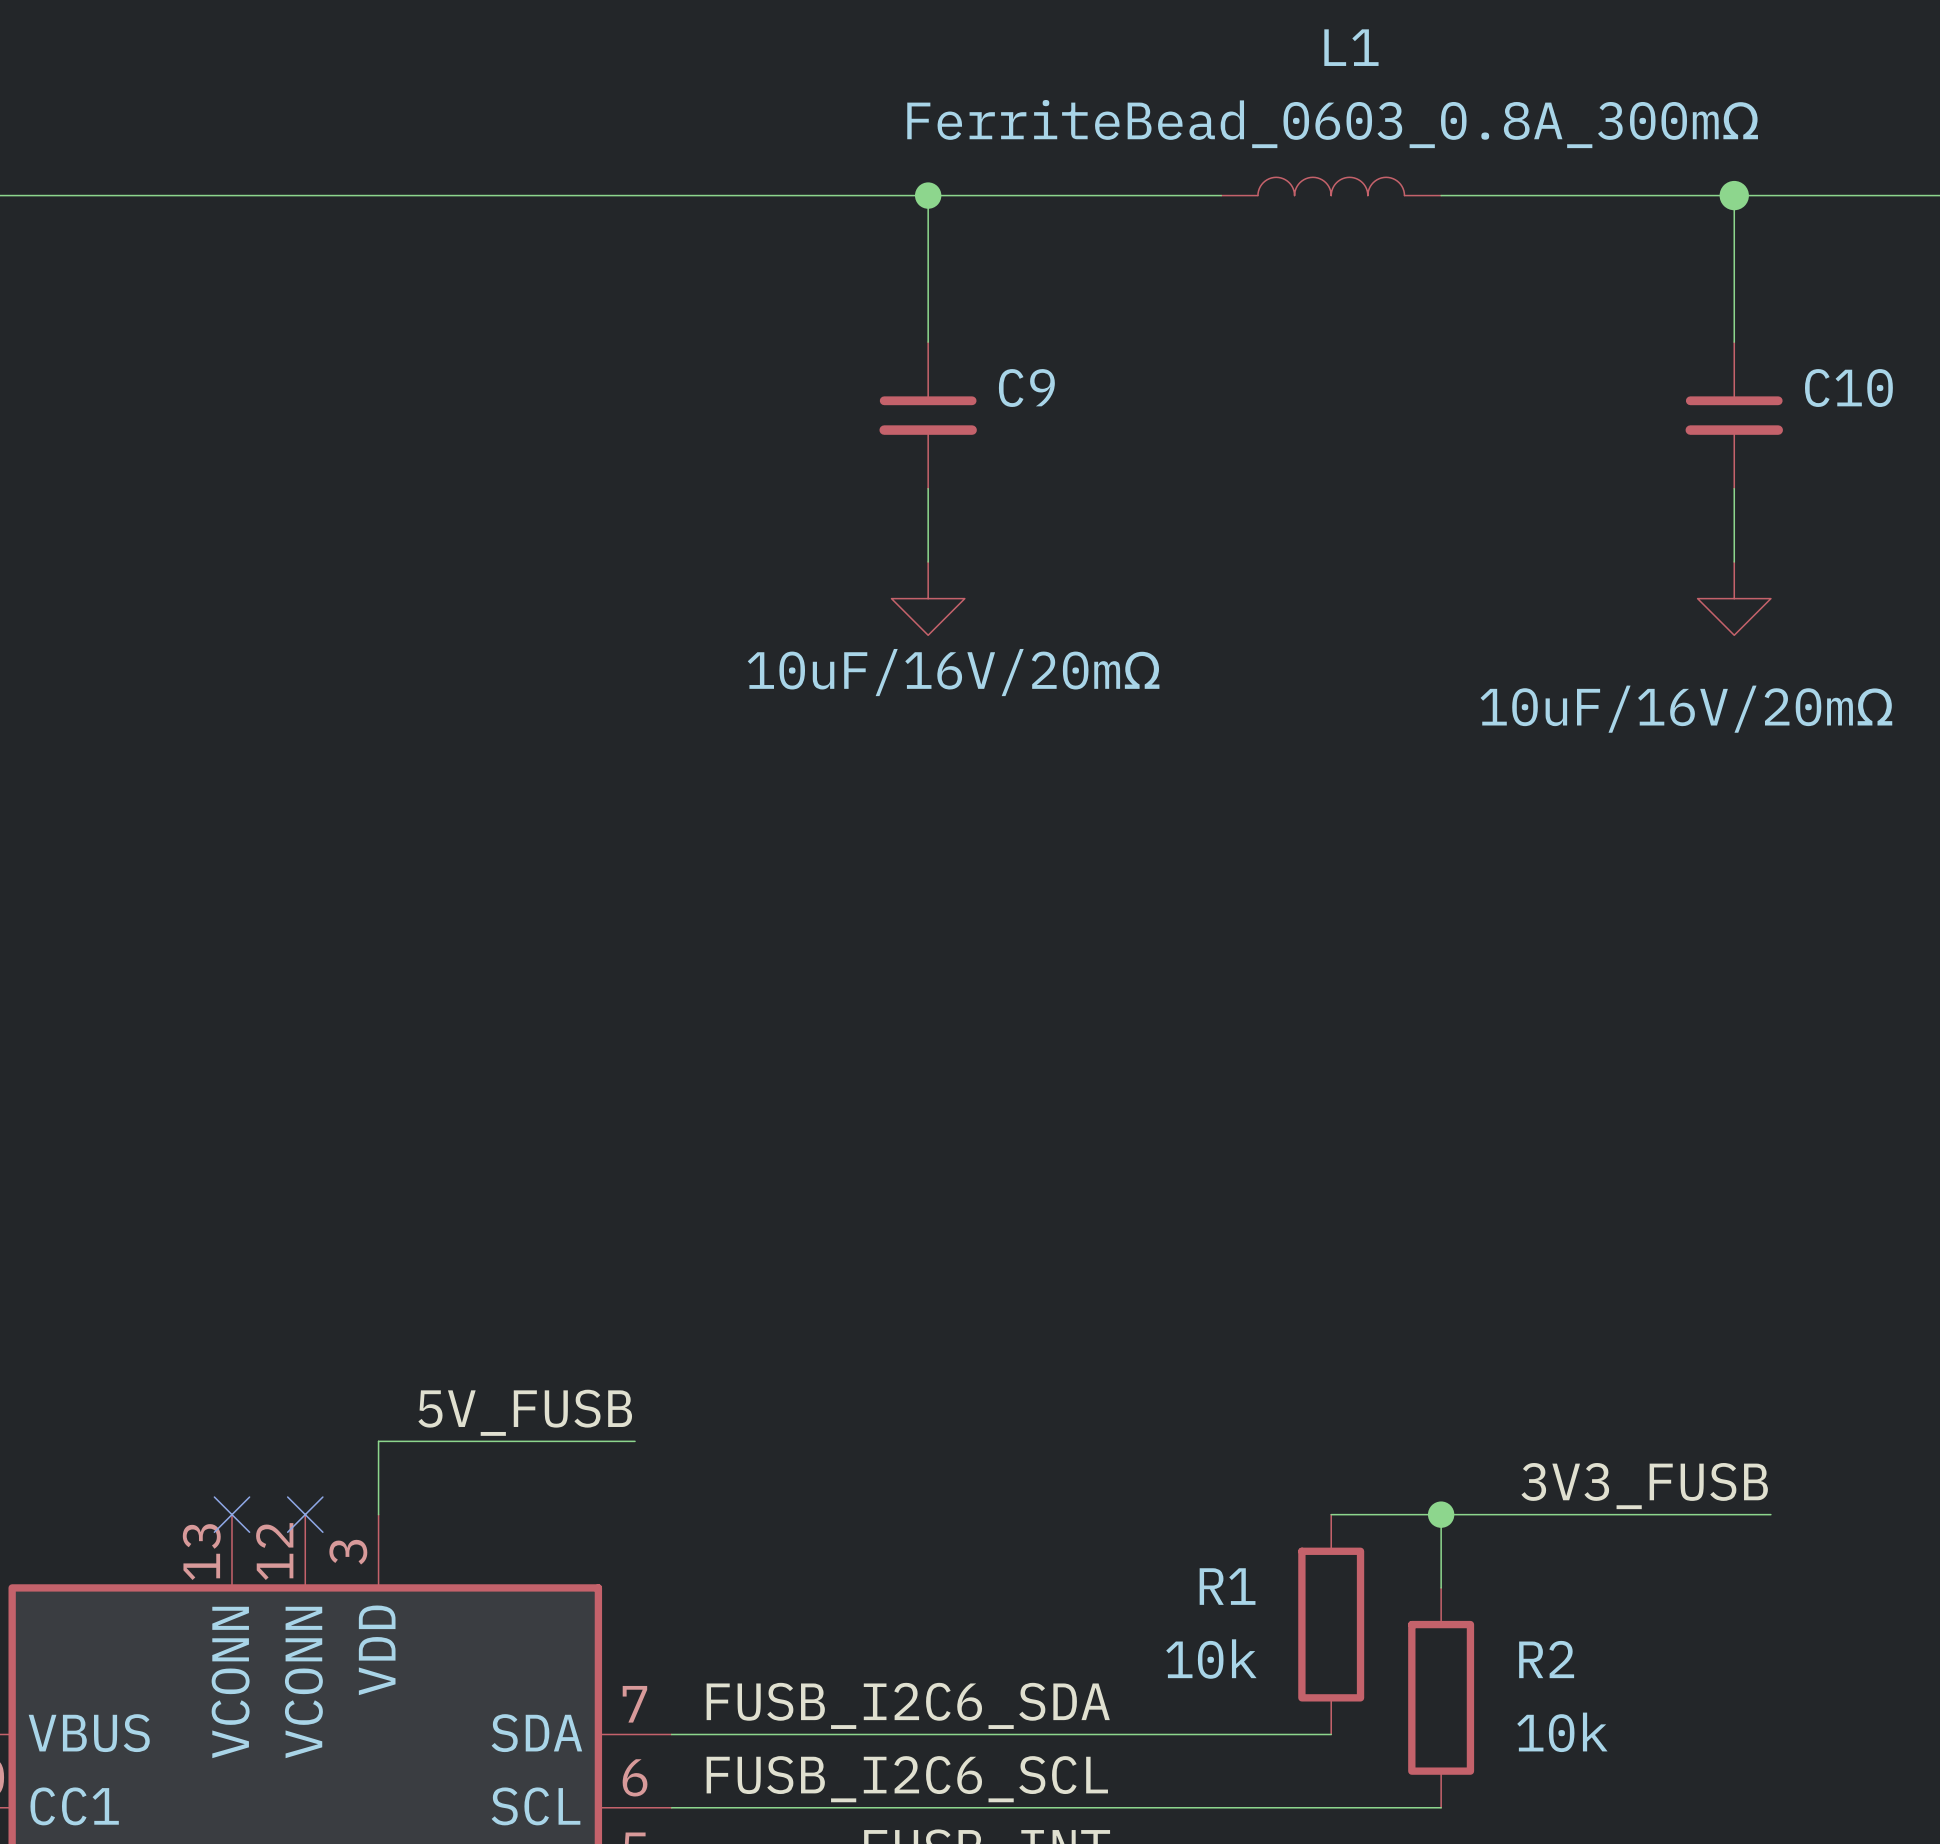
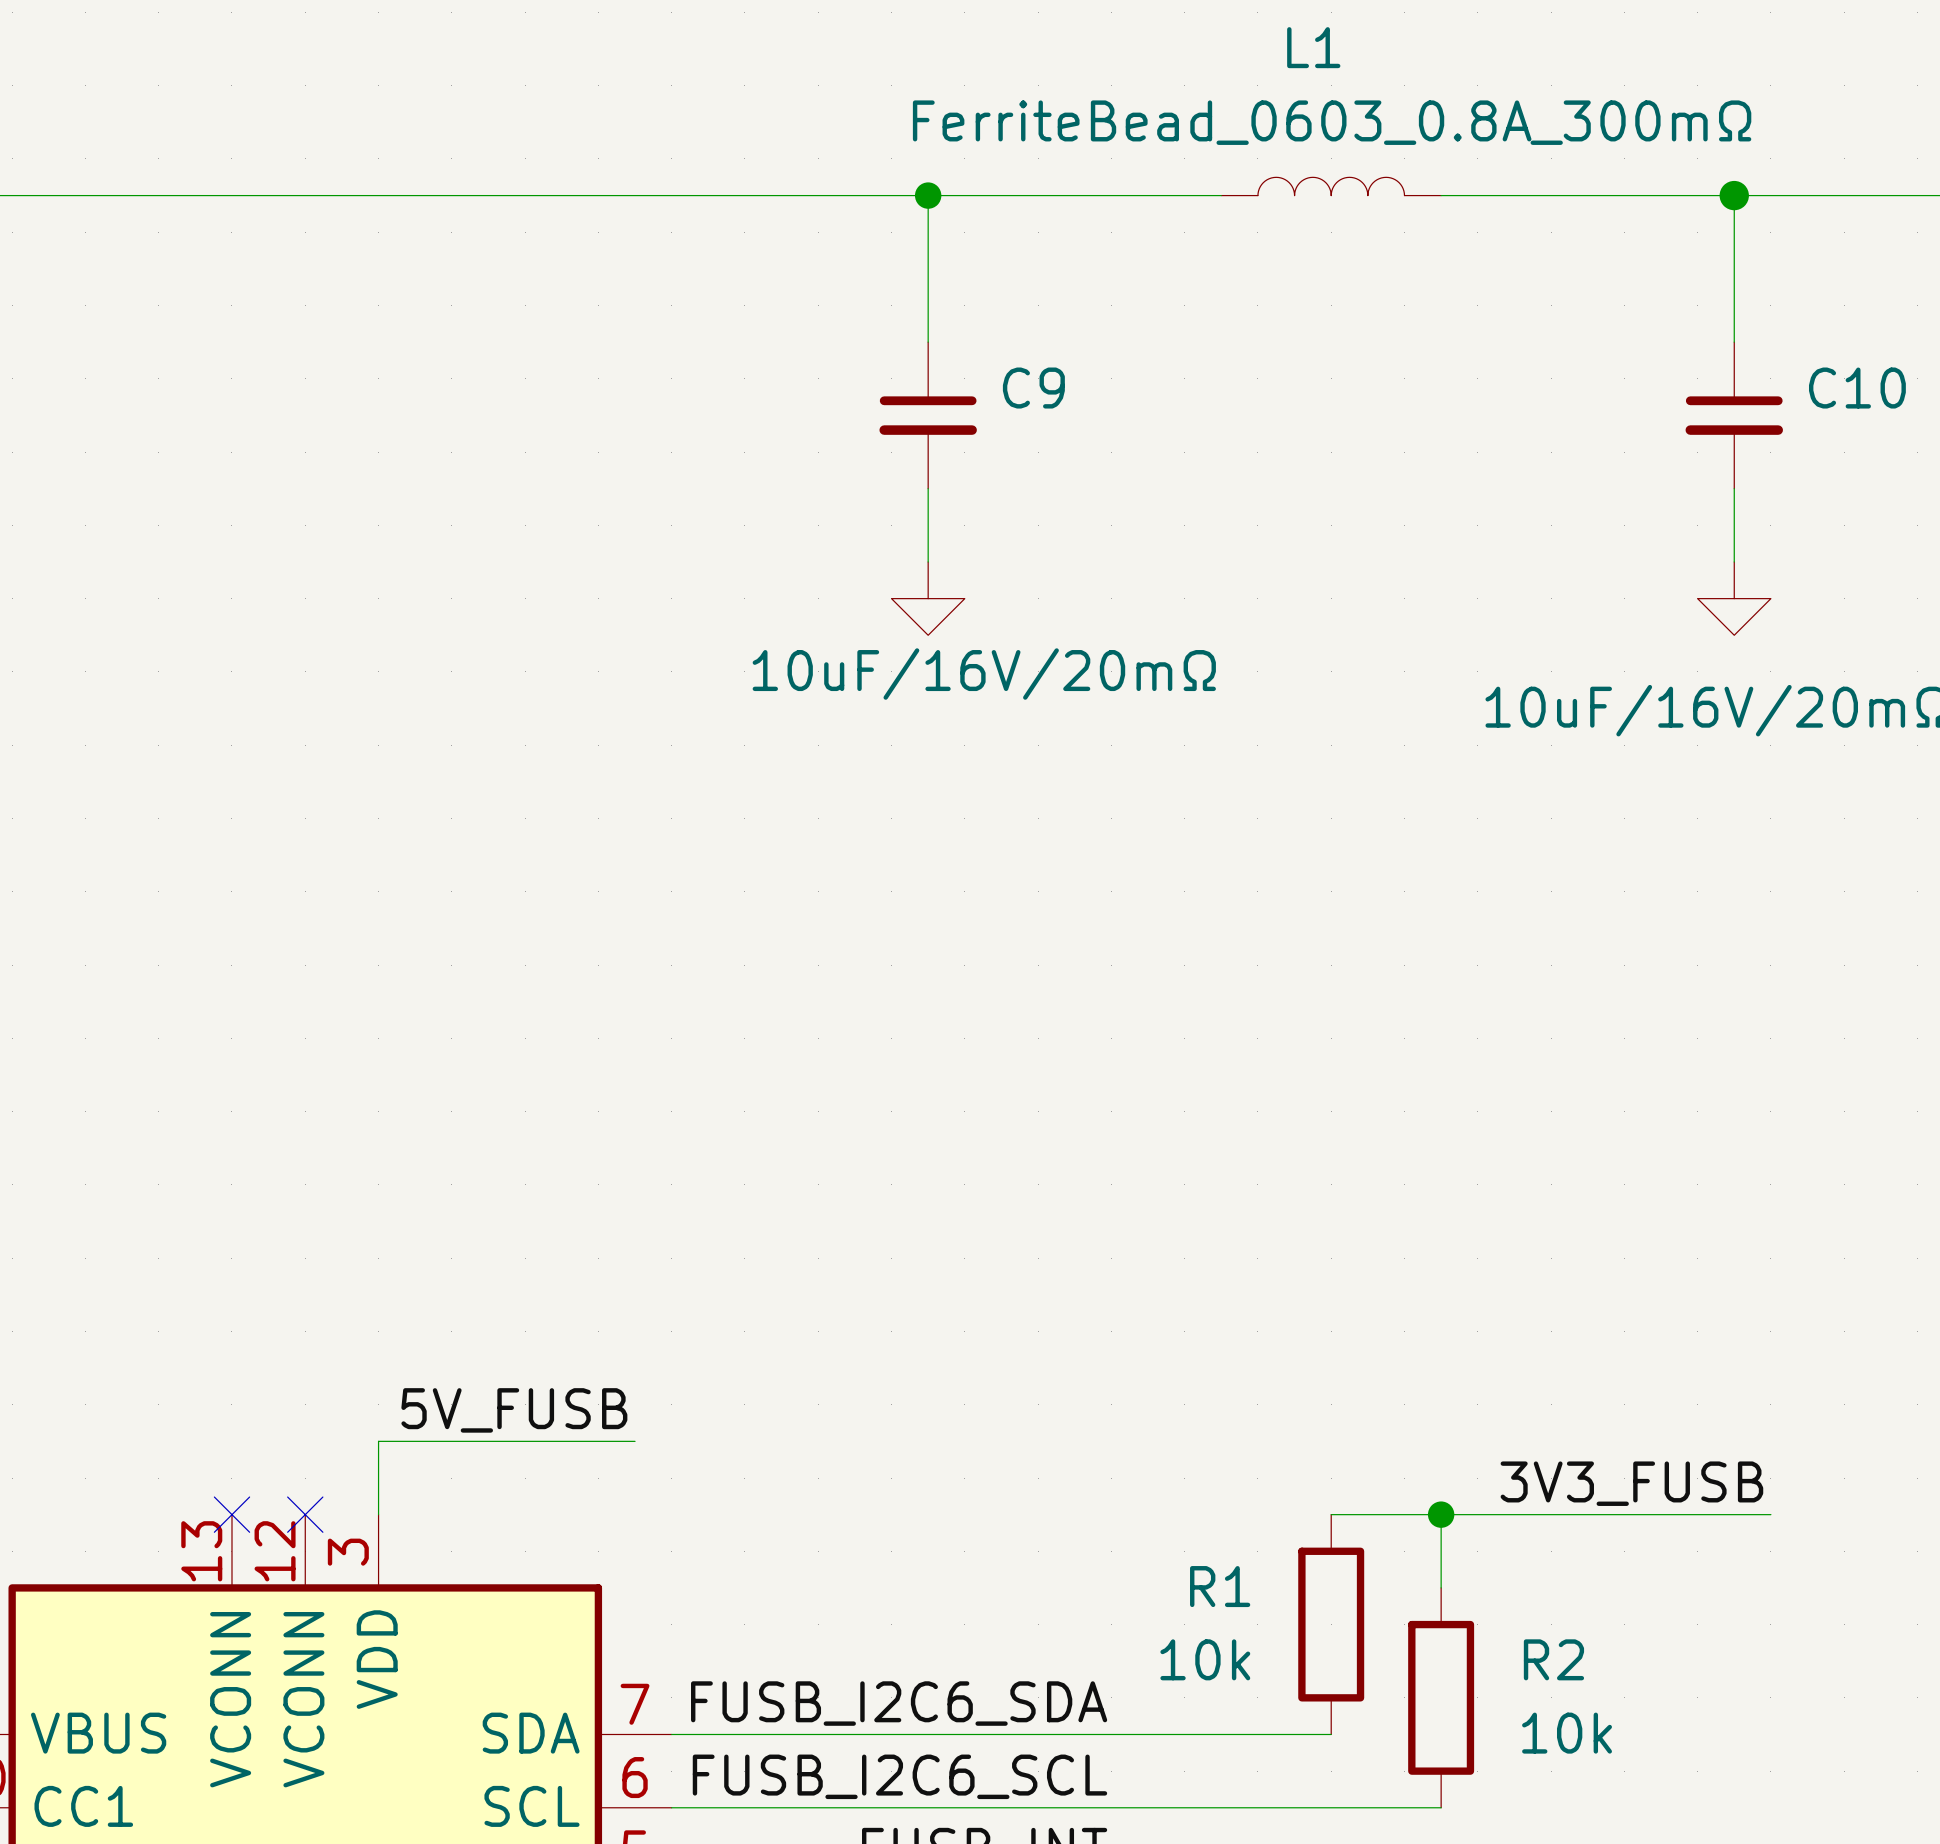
L1 name position: L1 (1351, 47) -> L1 (1313, 47)

